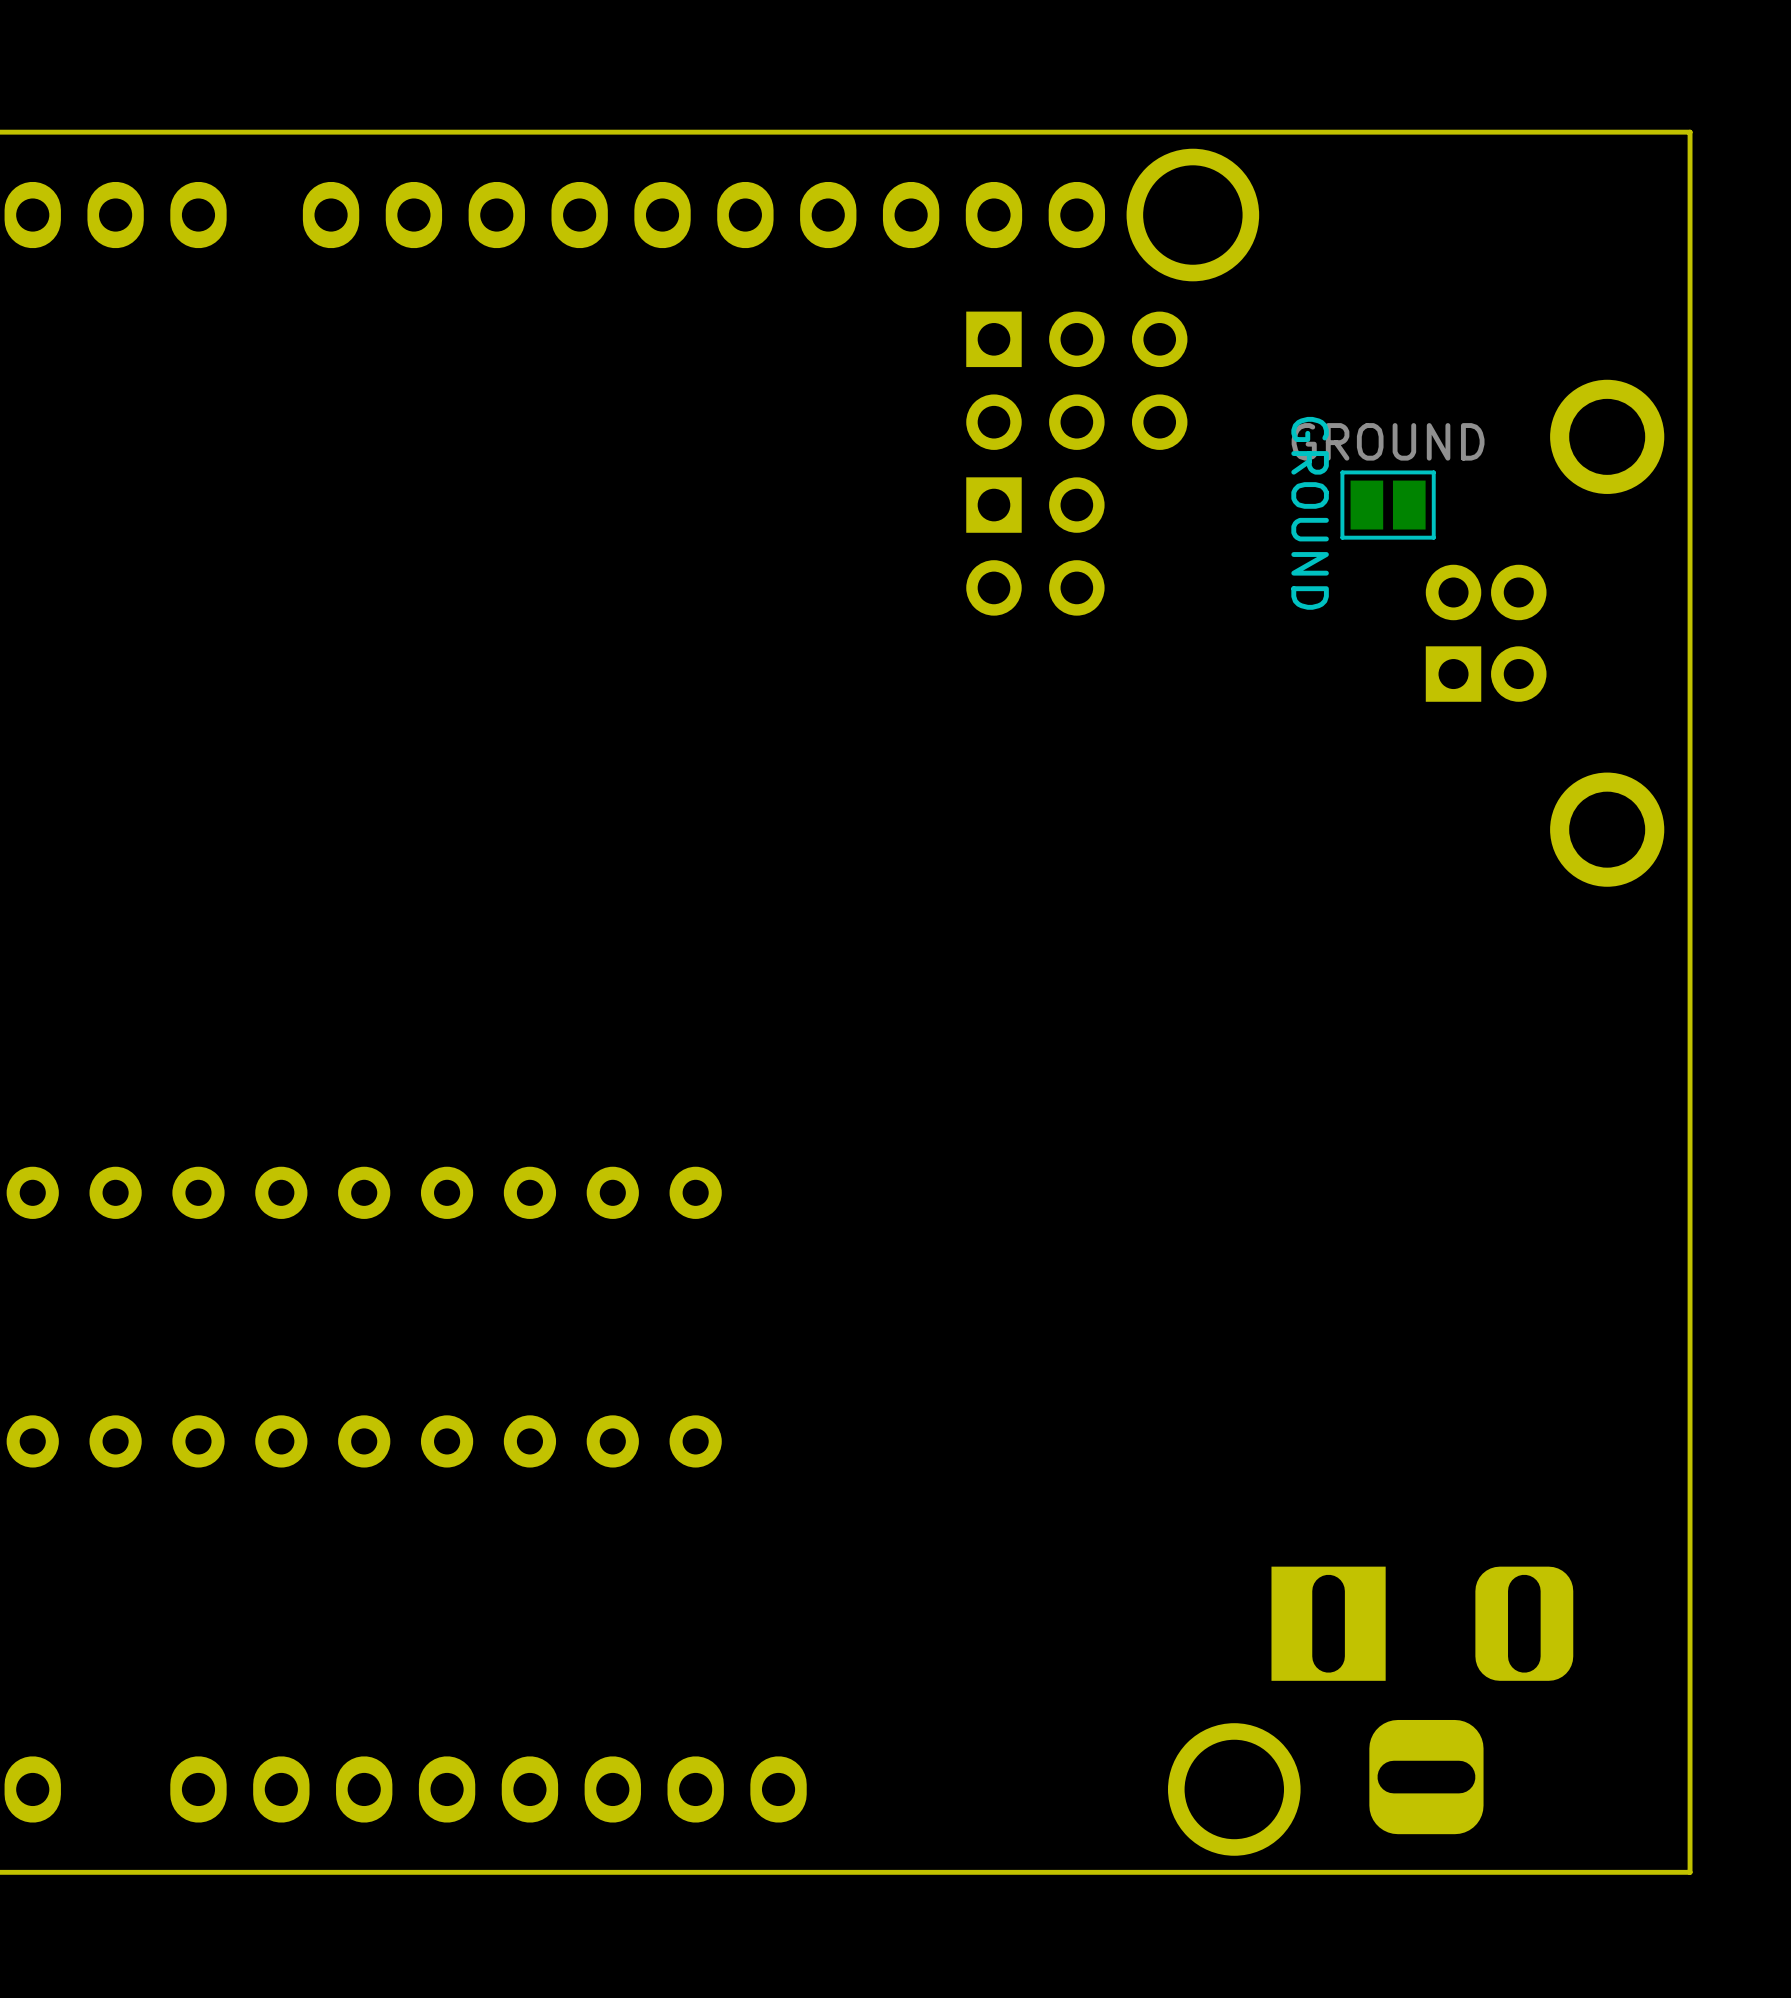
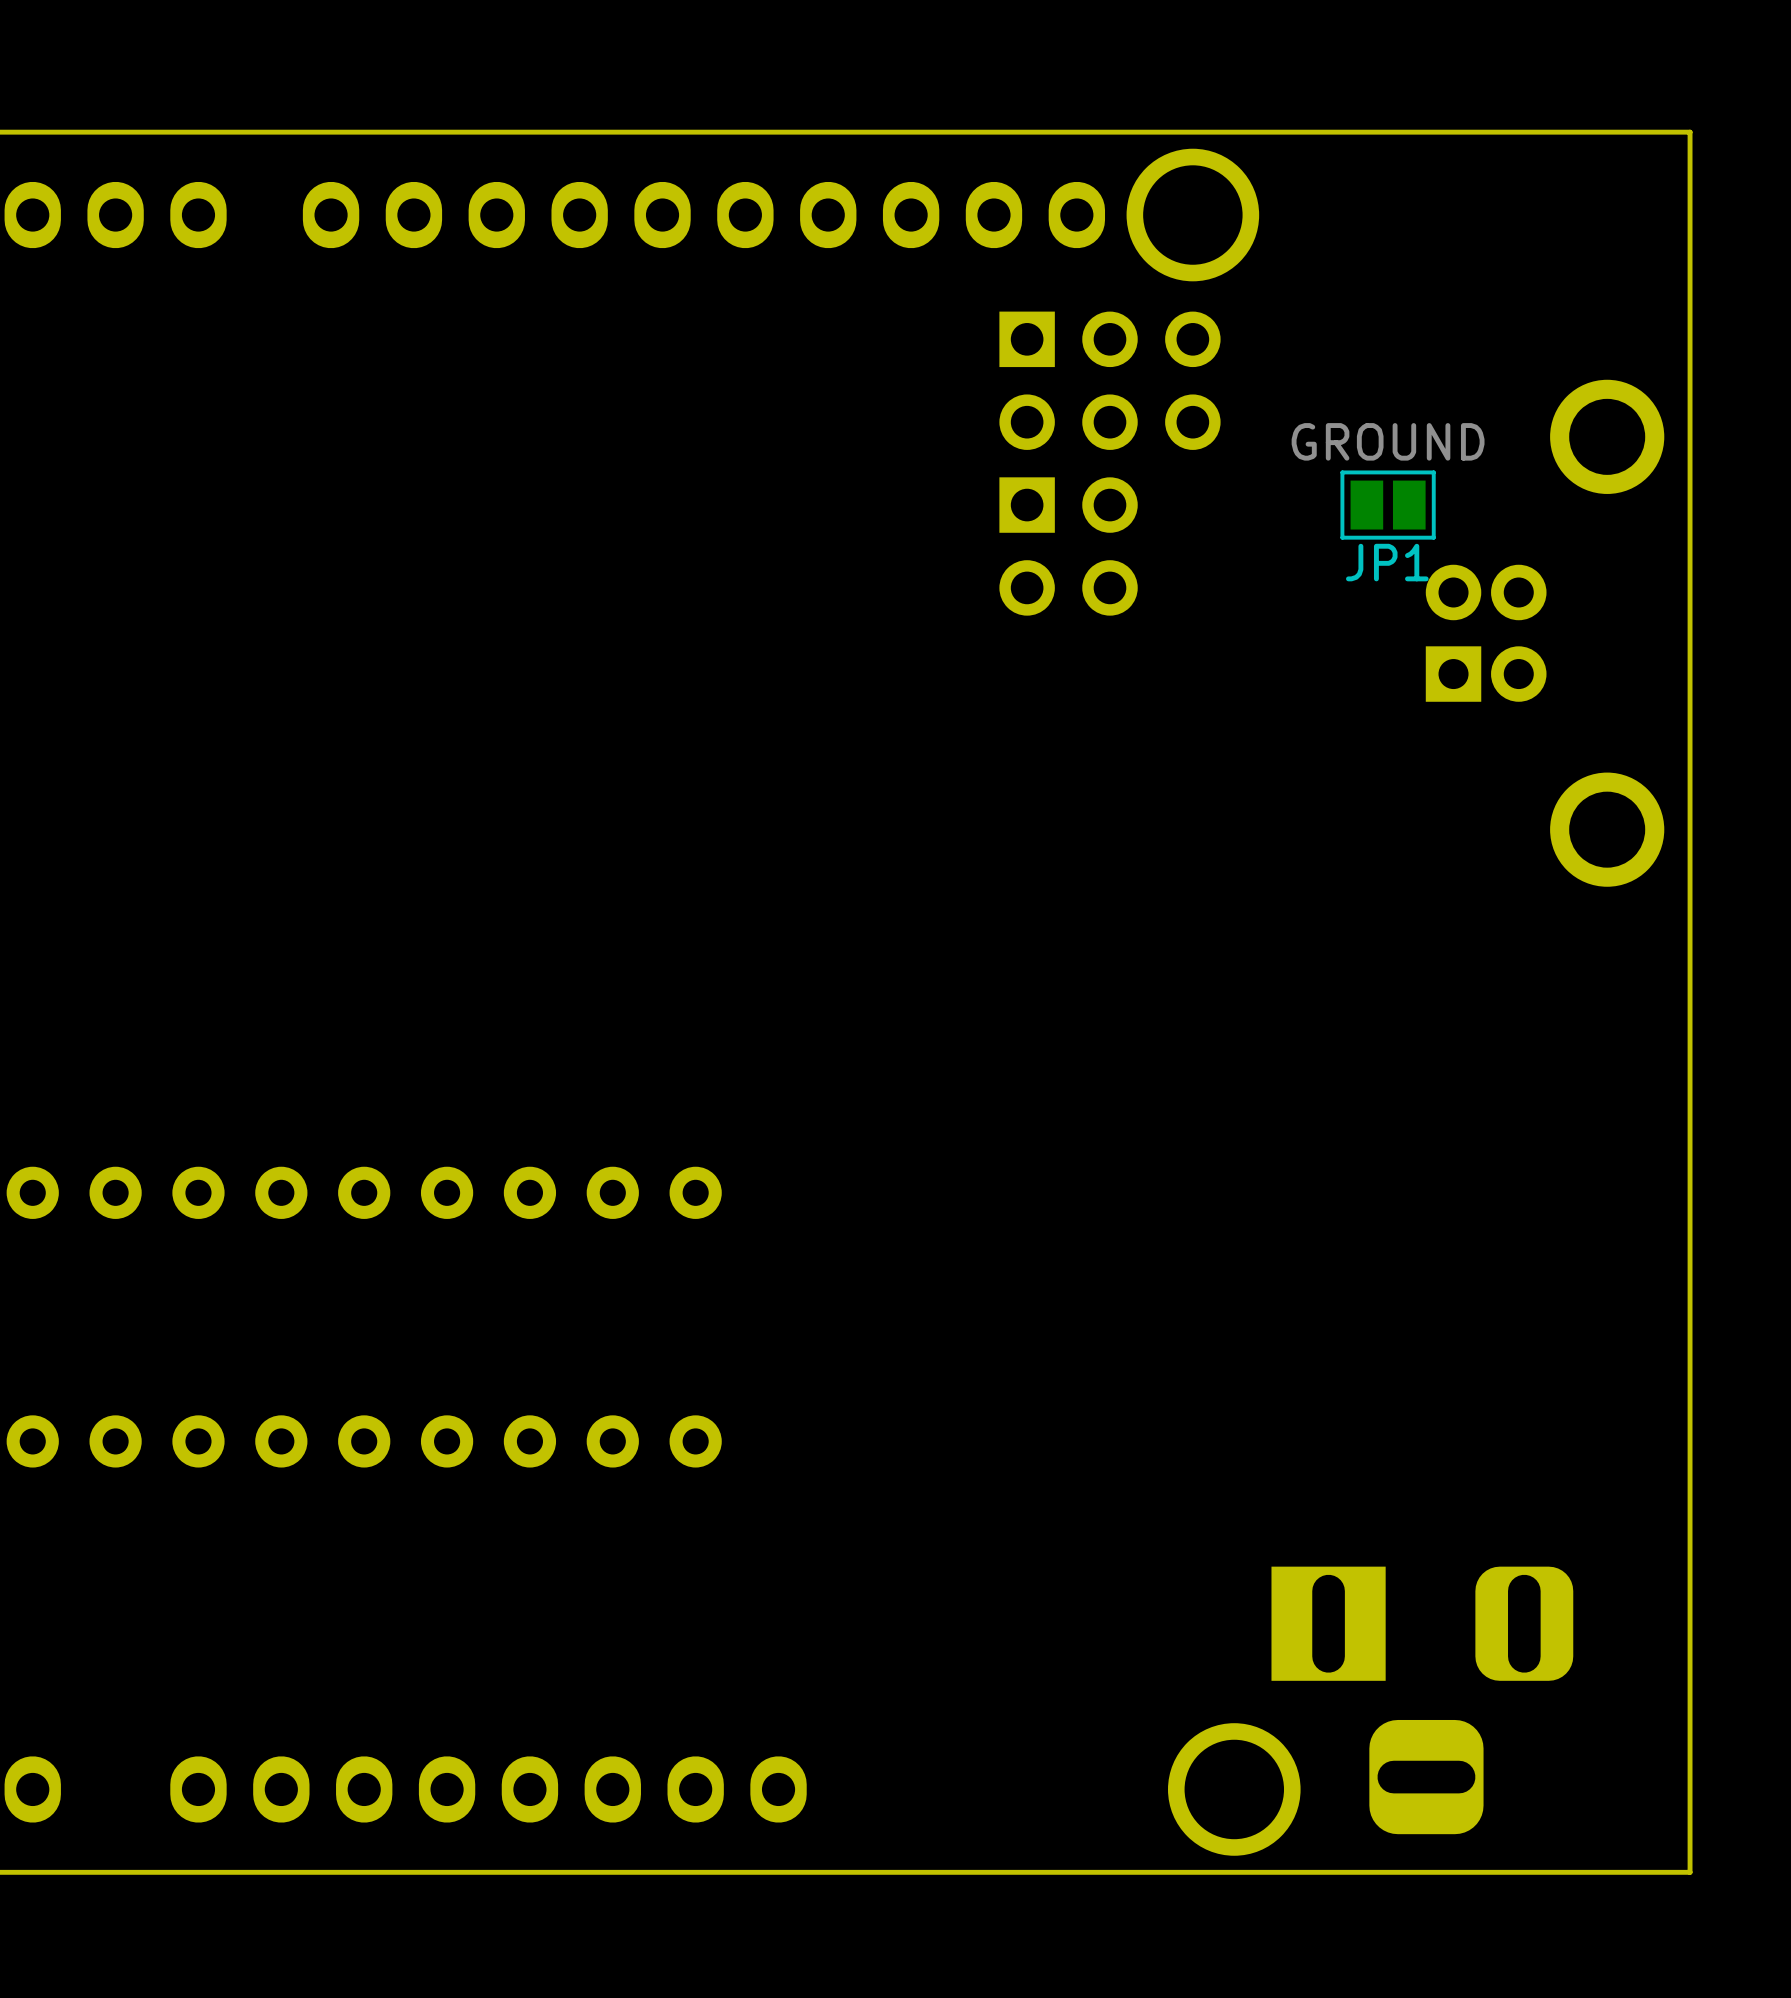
part position: (1076, 380) -> (1109, 380)
GROUND name: GROUND (1310, 513) -> JP1 (1387, 562)
part position: (1035, 546) -> (1068, 546)

